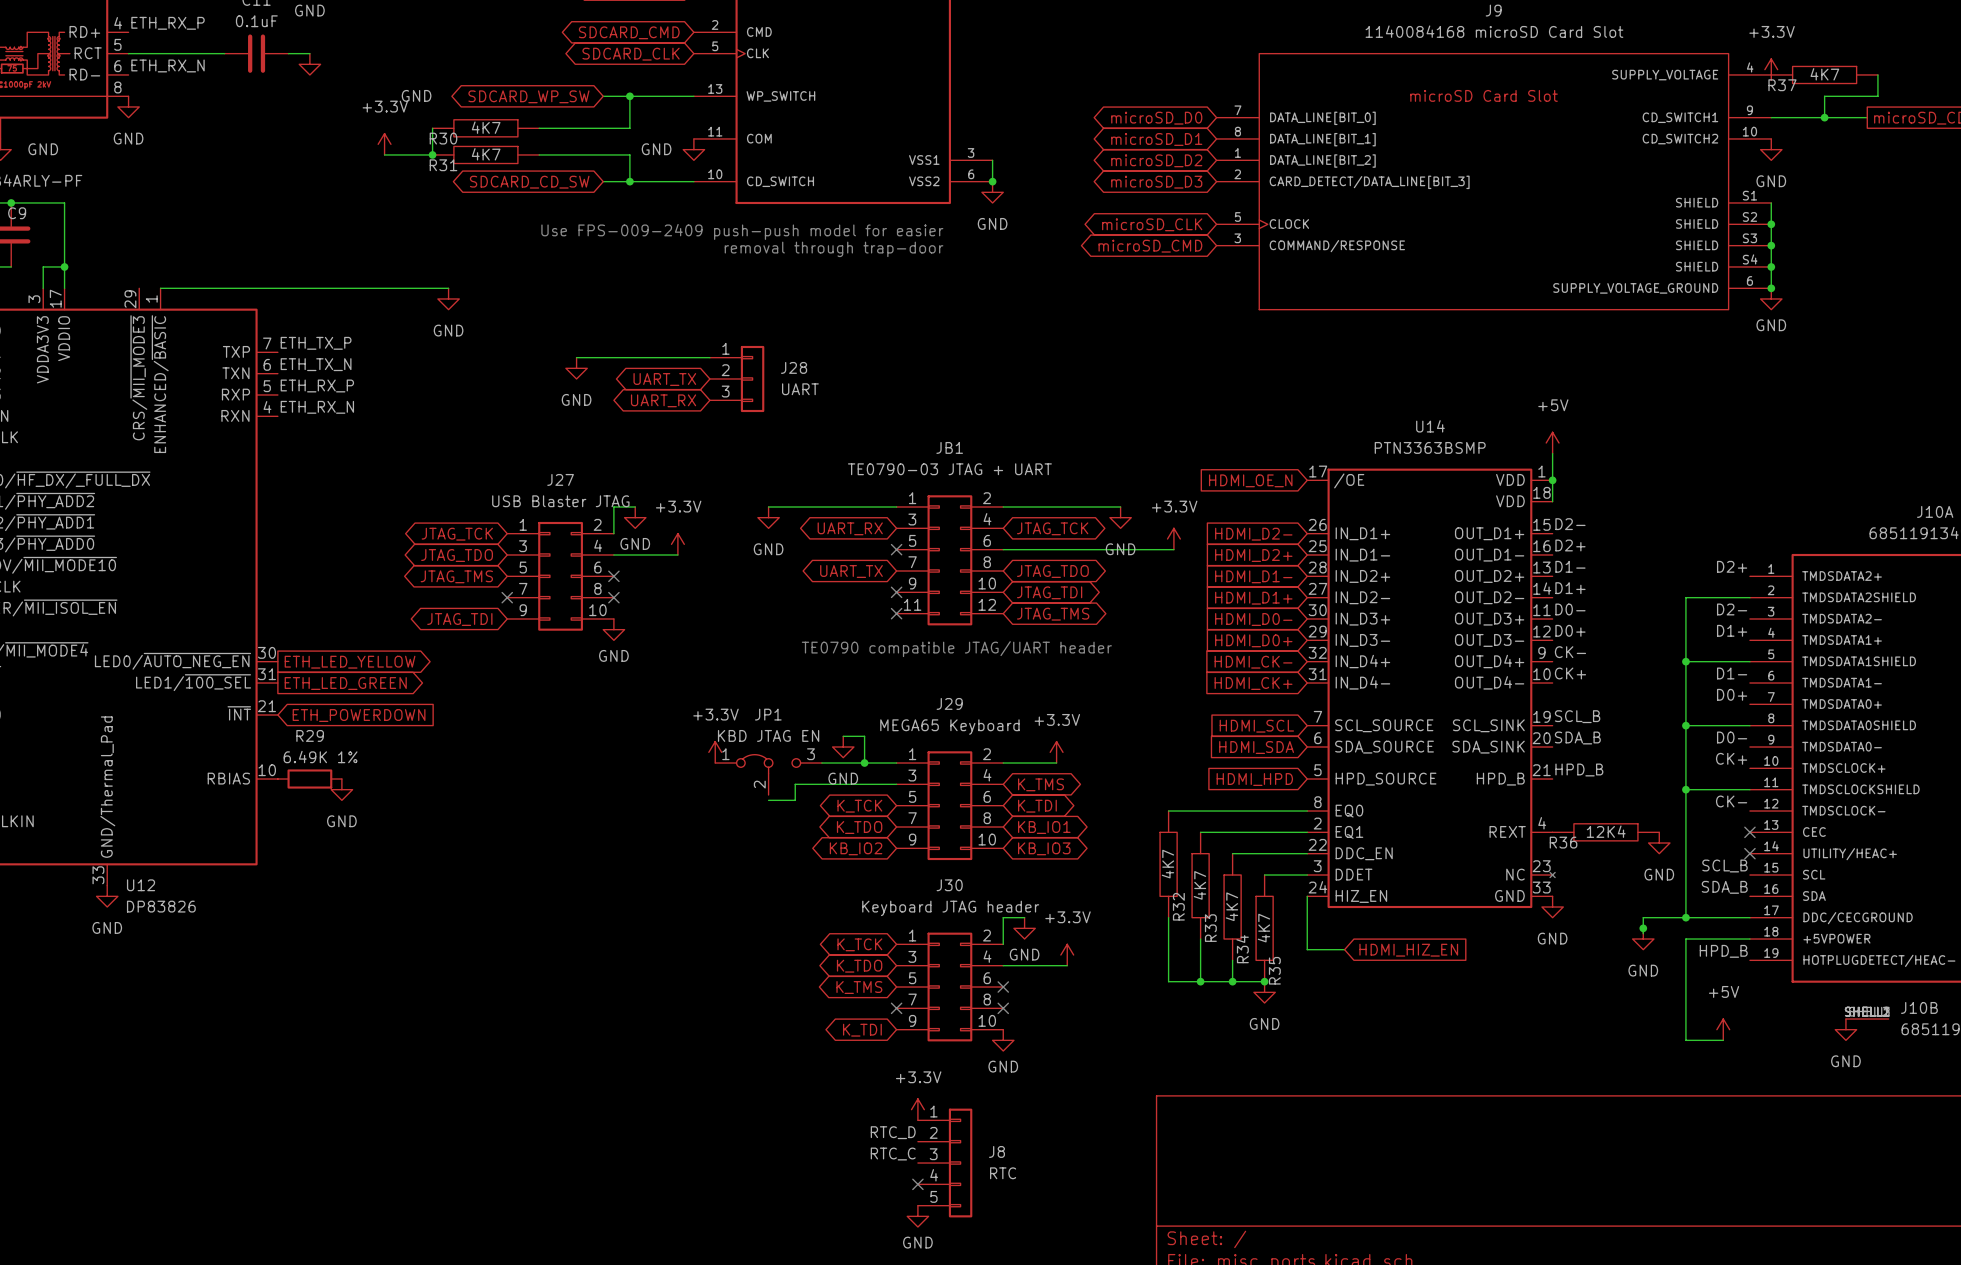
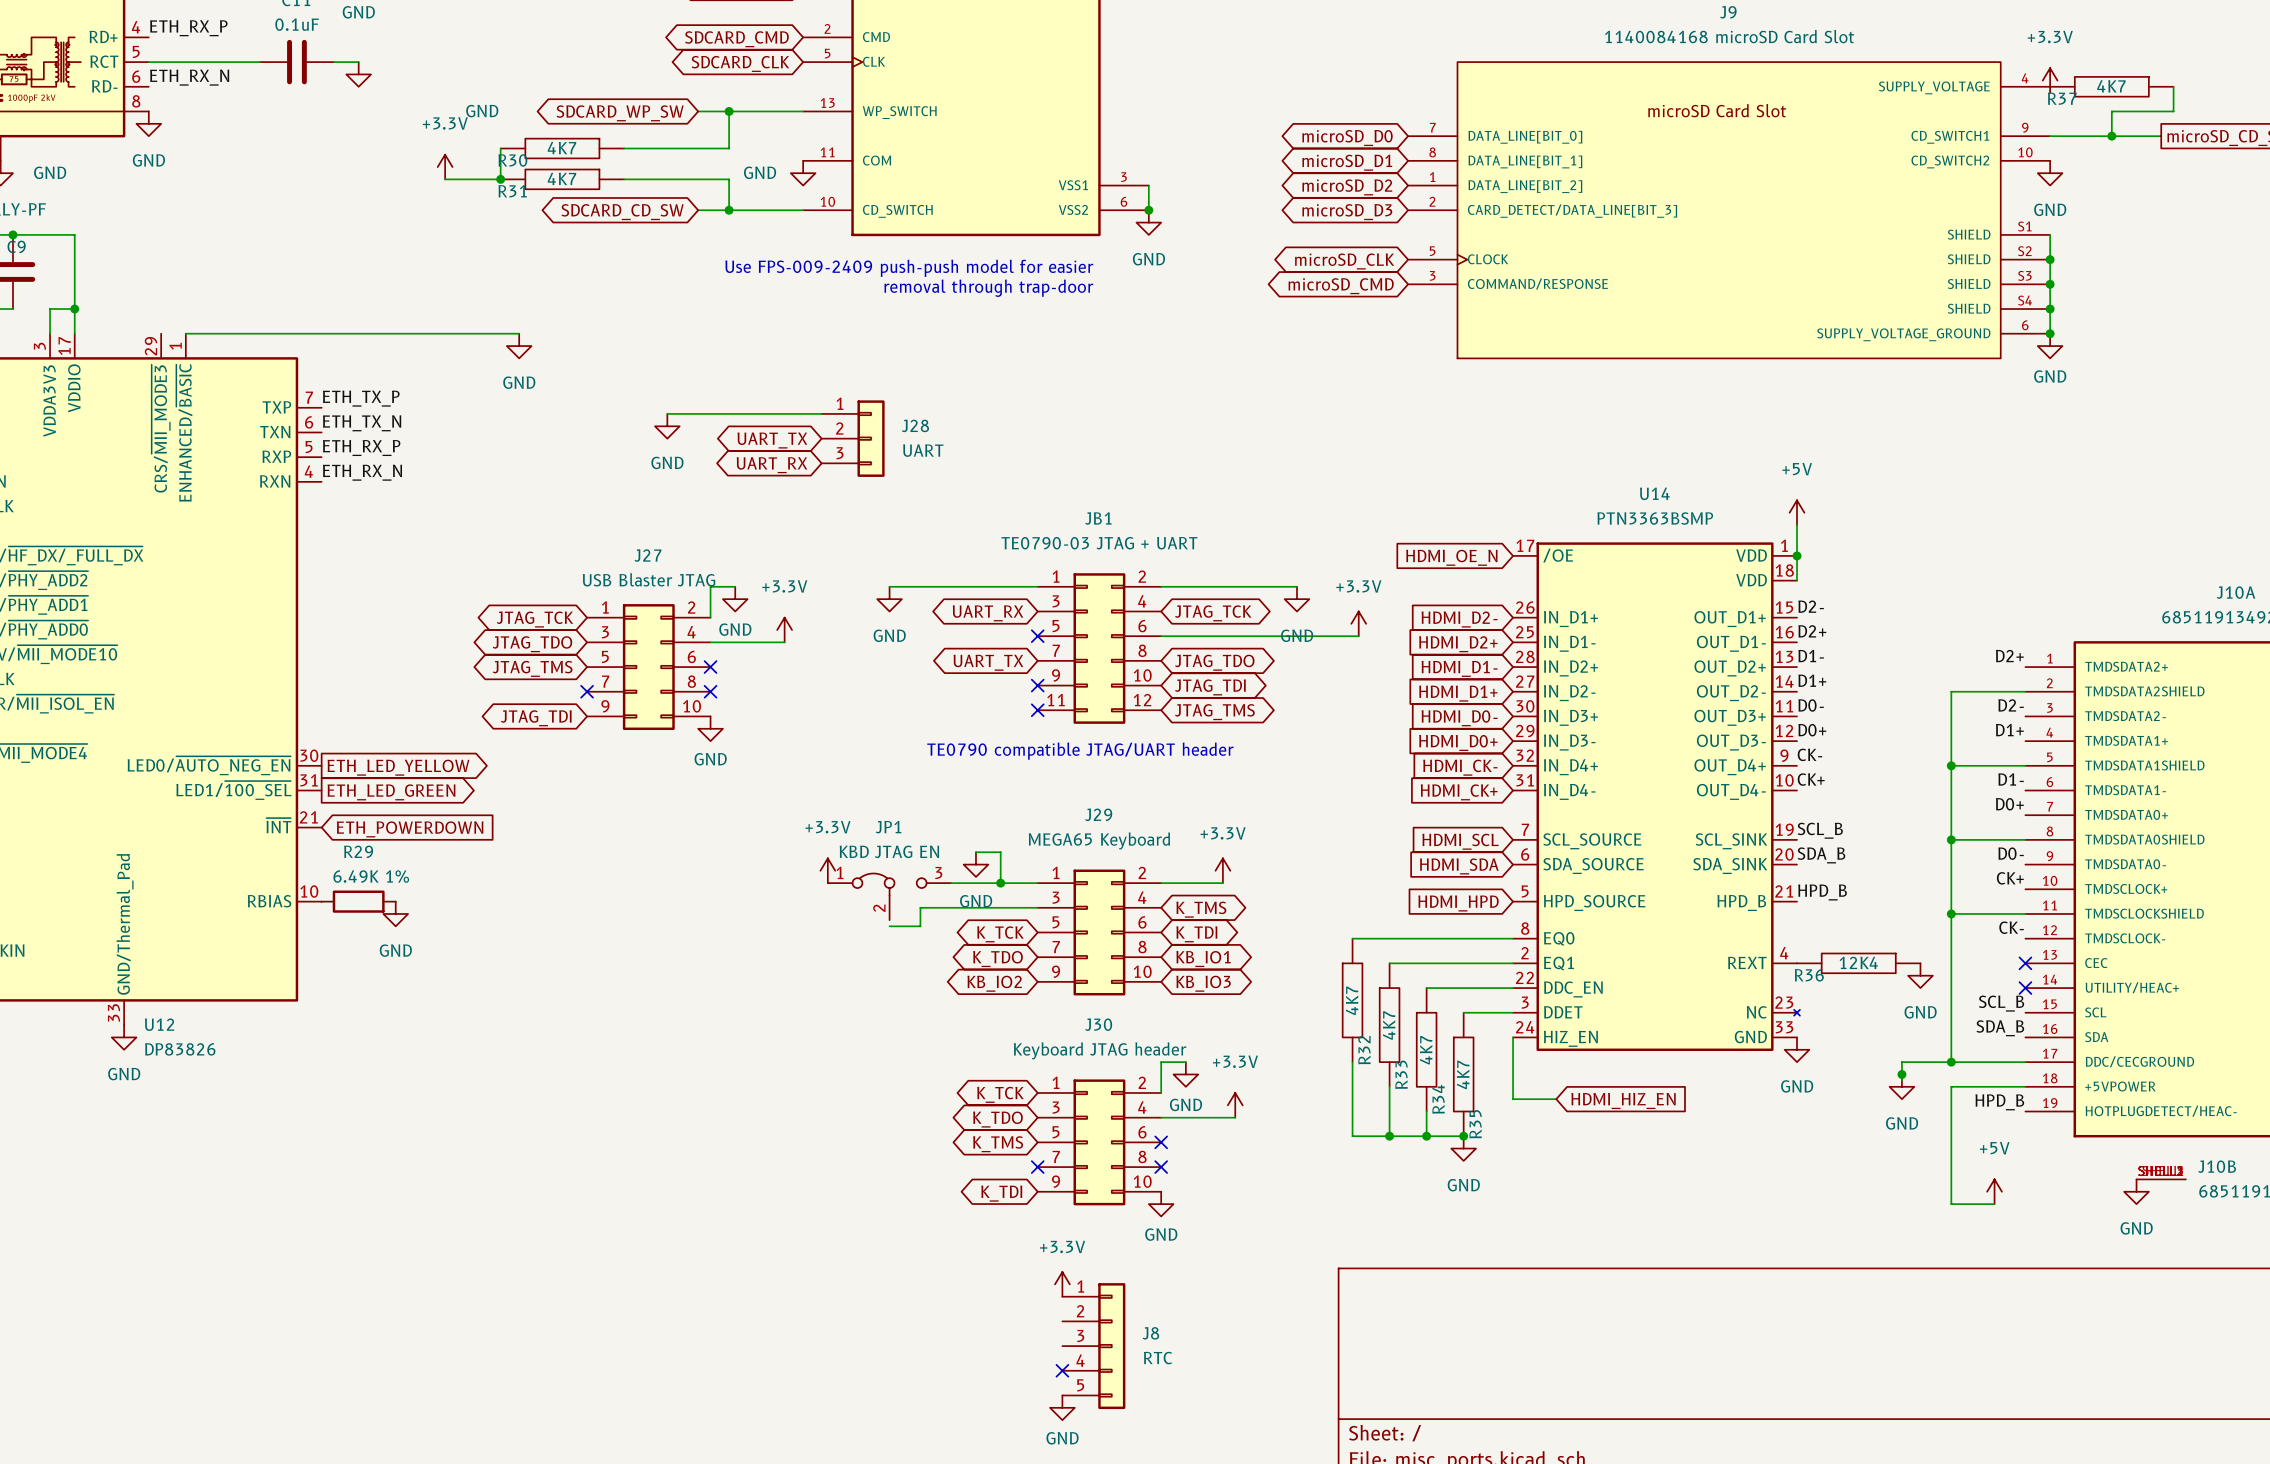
label: RTC_D (893, 1132) -> none
label: RTC_C (893, 1154) -> none

